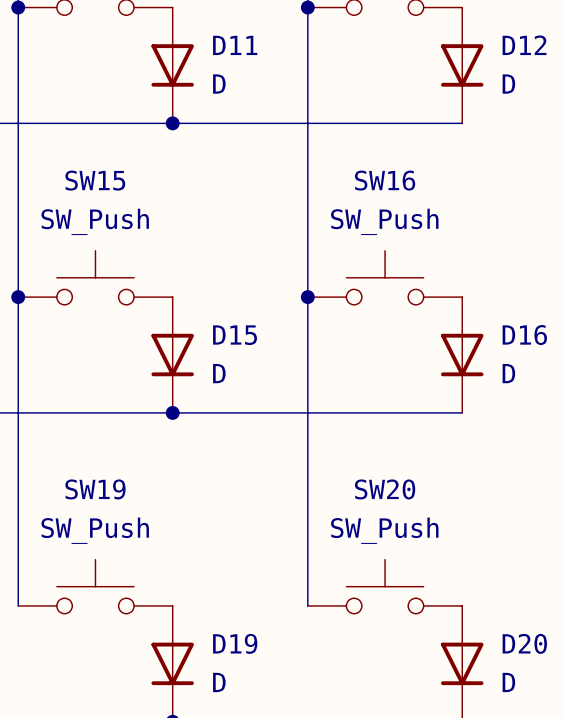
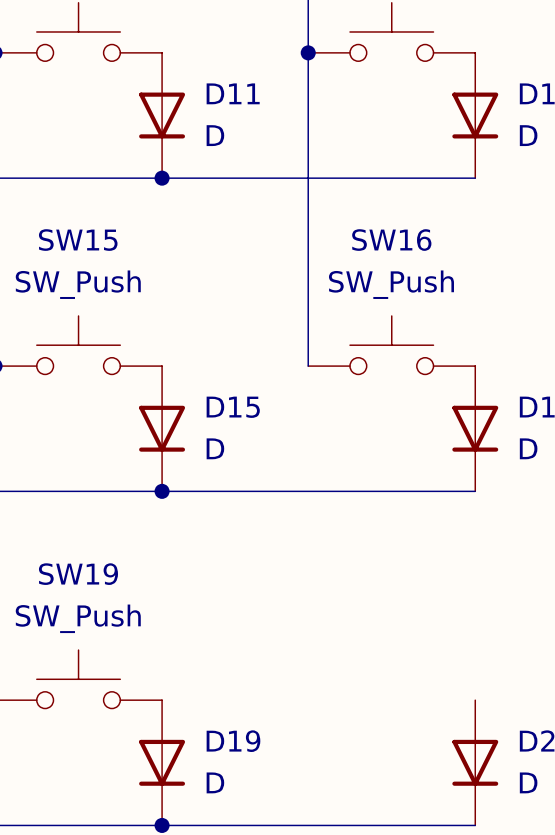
wire: (307, 297) (307, 605) -> none
junction: (307, 297) -> none
SW20: SW_Push (385, 586) -> none

